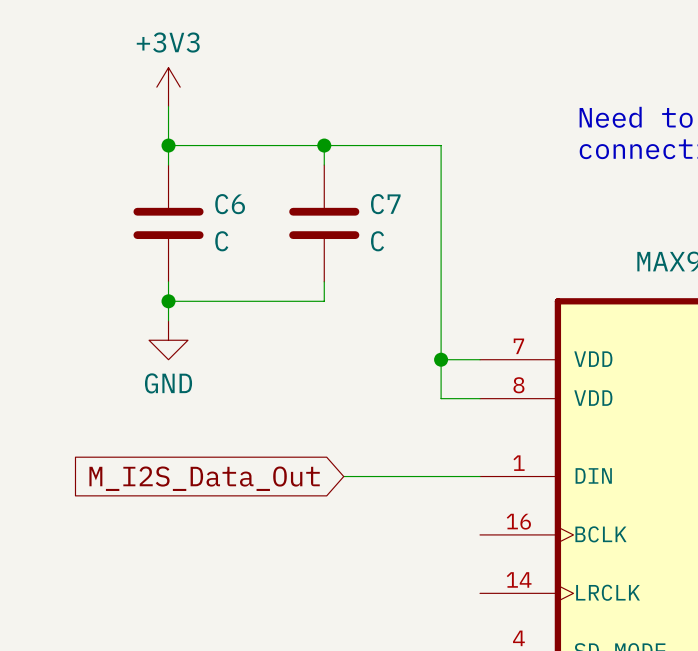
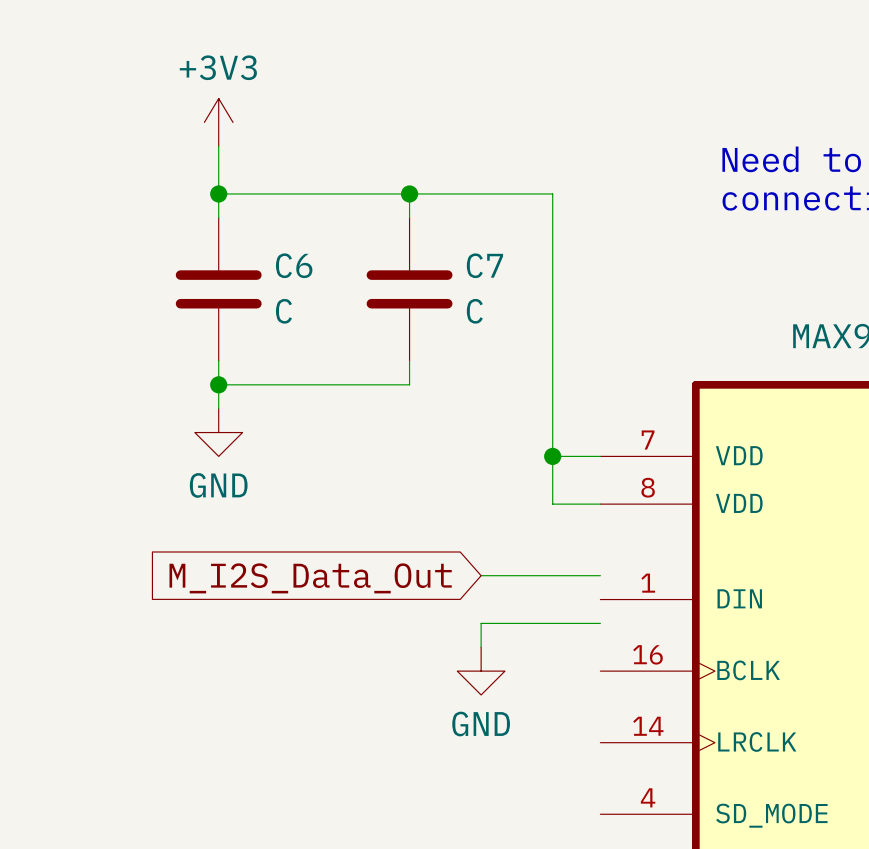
wire: none -> (481, 575) (600, 575)
wire: (343, 476) (480, 476) -> none
global label position: M_I2S_Data_Out (204, 478) -> M_I2S_Data_Out (310, 578)
wire: none -> (600, 623) (481, 623) (481, 647)
power symbol: none -> GND (481, 671)

